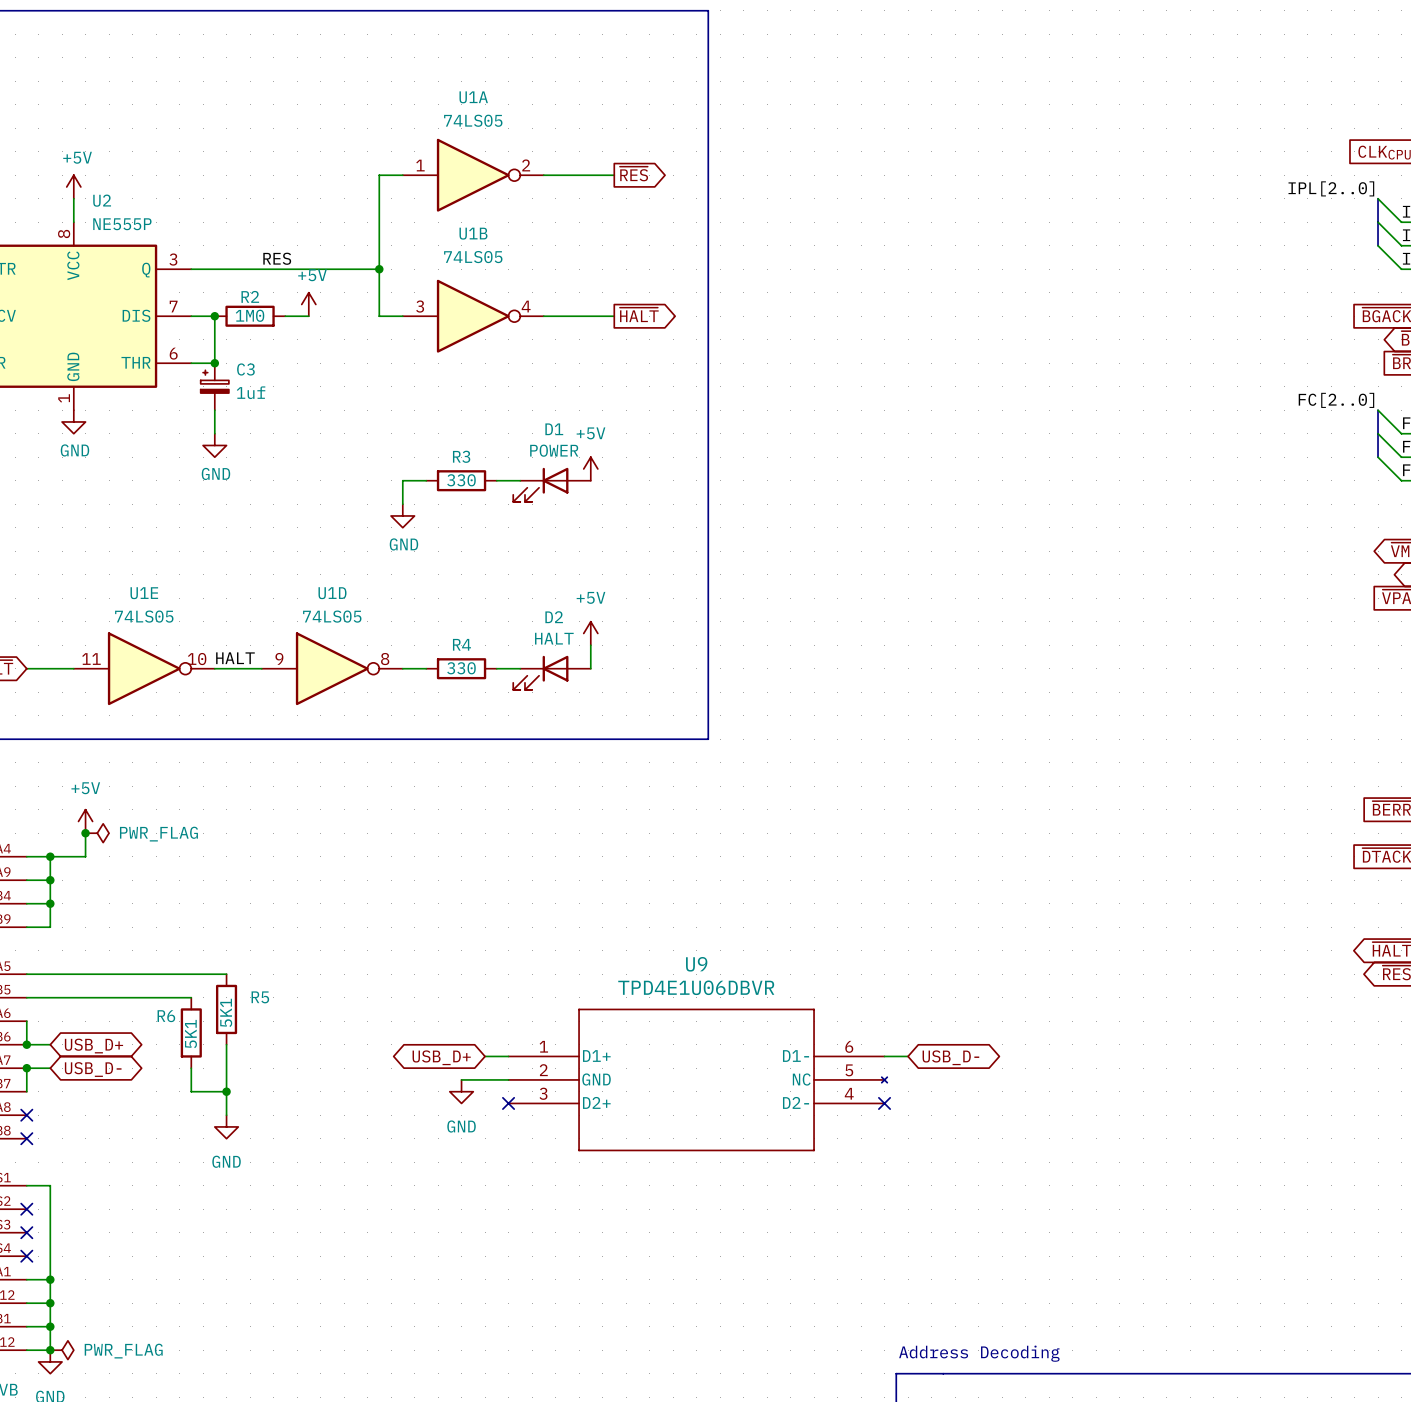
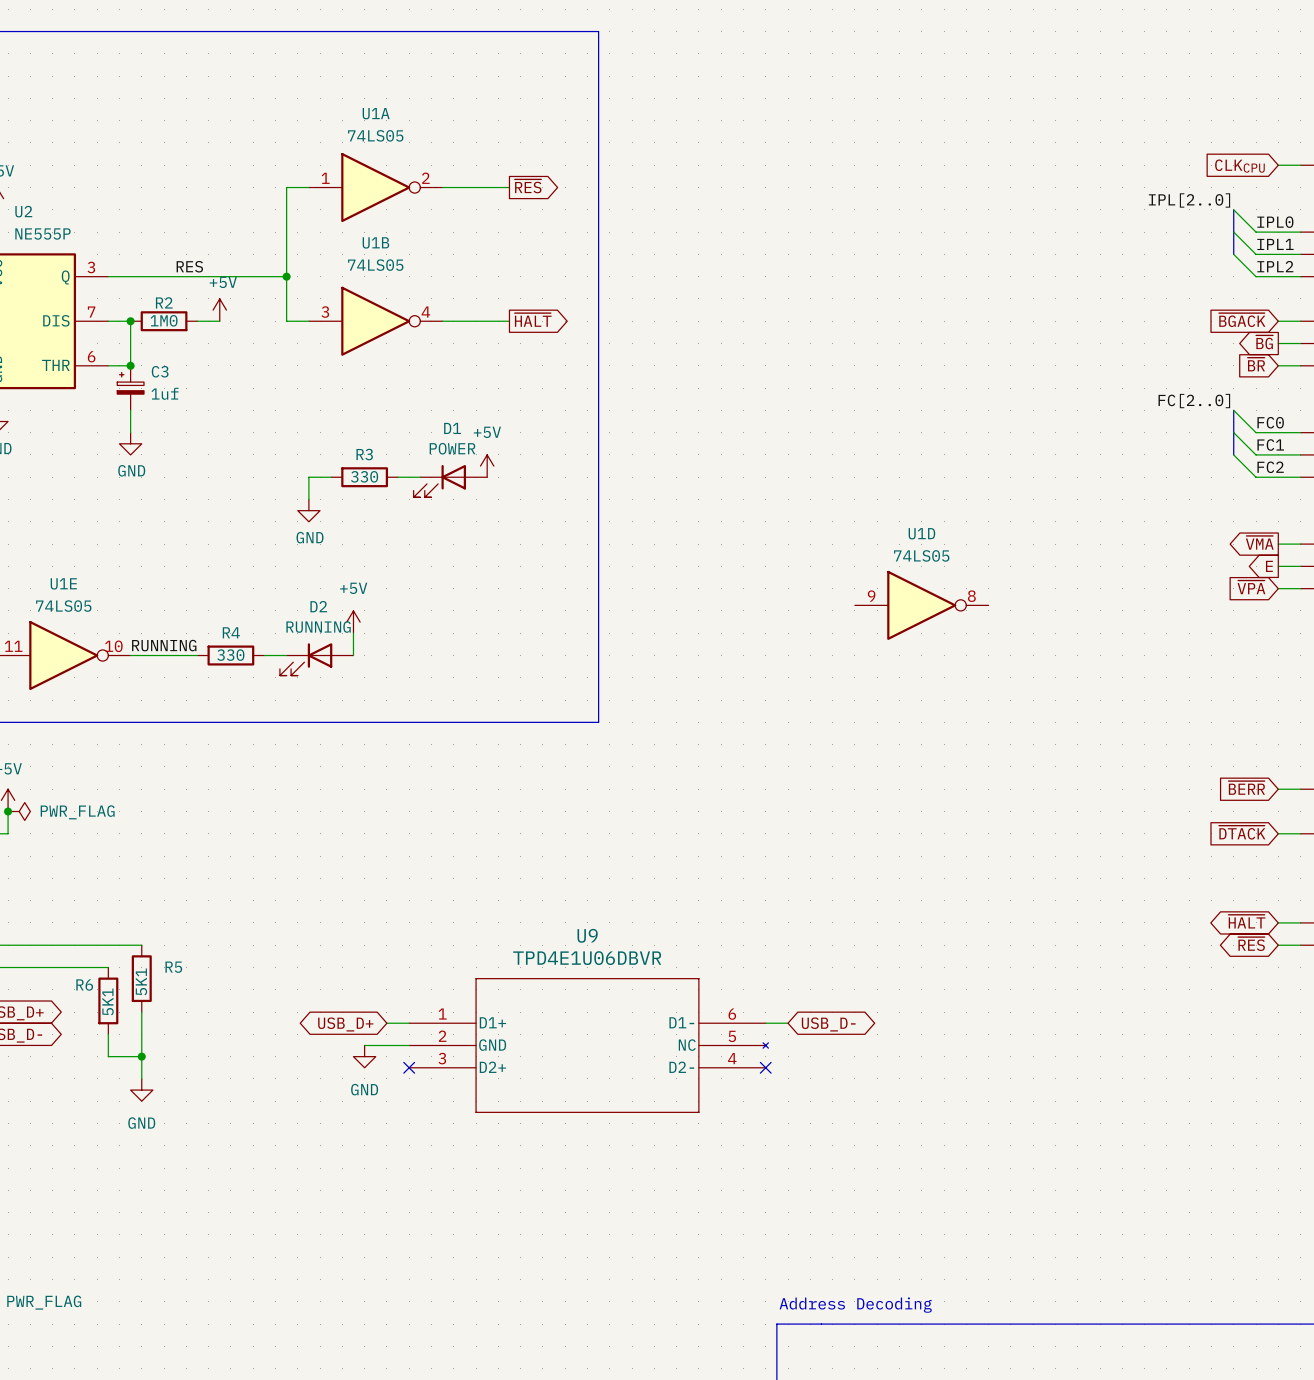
power symbol position: +5V (590, 633) -> +5V (353, 622)
D2 value: HALT (554, 638) -> RUNNING (318, 627)
wire: (590, 645) (590, 668) -> (353, 633) (353, 655)
label: HALT (235, 658) -> RUNNING (164, 645)
U1D position: (332, 668) -> (921, 605)
R4 position: (461, 668) -> (230, 655)
wire: (496, 668) (520, 668) -> none
D2 position: (552, 672) -> (316, 659)

